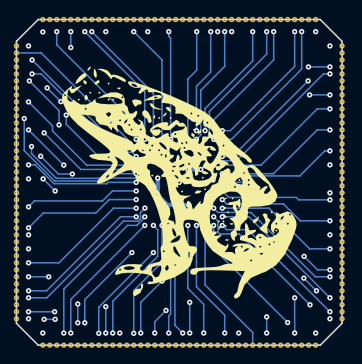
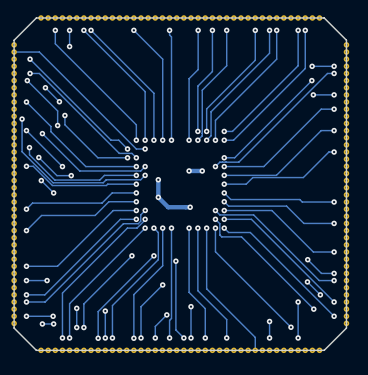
via: (42, 31) -> none
via: (105, 31) -> none
via: (147, 31) -> none
via: (217, 31) -> none
via: (231, 31) -> none
via: (315, 31) -> none
via: (28, 45) -> none
via: (329, 45) -> none
drawing: [61, 66, 297, 299] -> none
via: (329, 164) -> none
via: (28, 178) -> none
via: (179, 182) -> none
via: (329, 192) -> none
via: (28, 234) -> none
via: (329, 234) -> none
via: (28, 248) -> none
via: (28, 318) -> none
via: (329, 318) -> none
via: (42, 333) -> none
via: (119, 333) -> none
via: (238, 333) -> none
via: (315, 333) -> none

